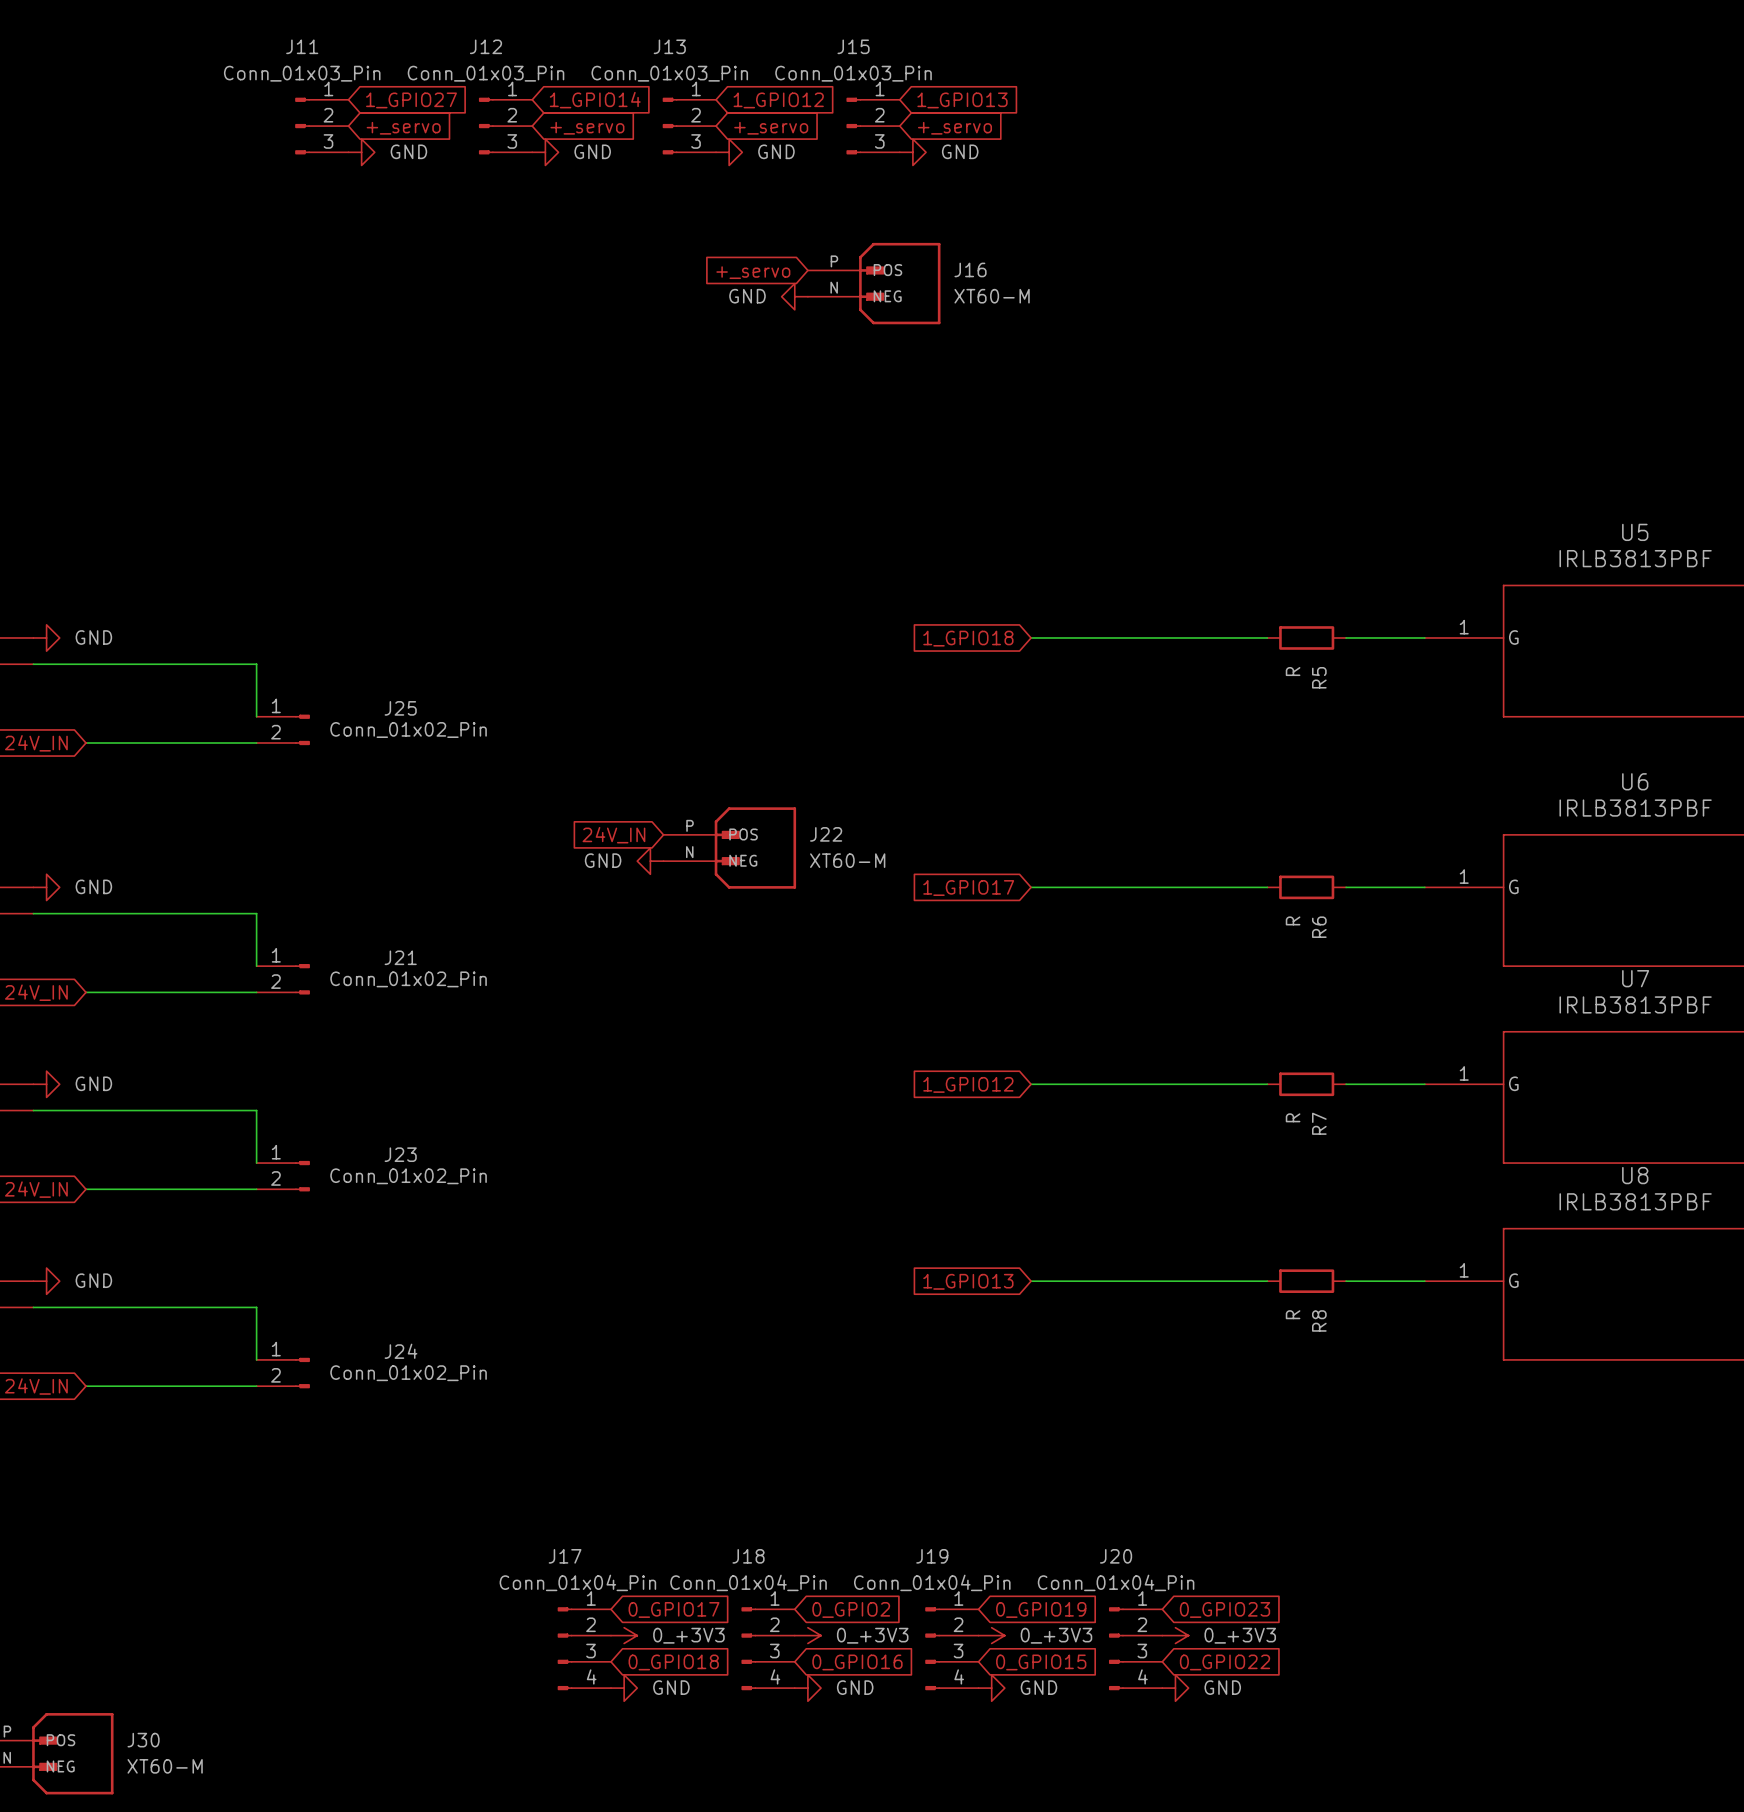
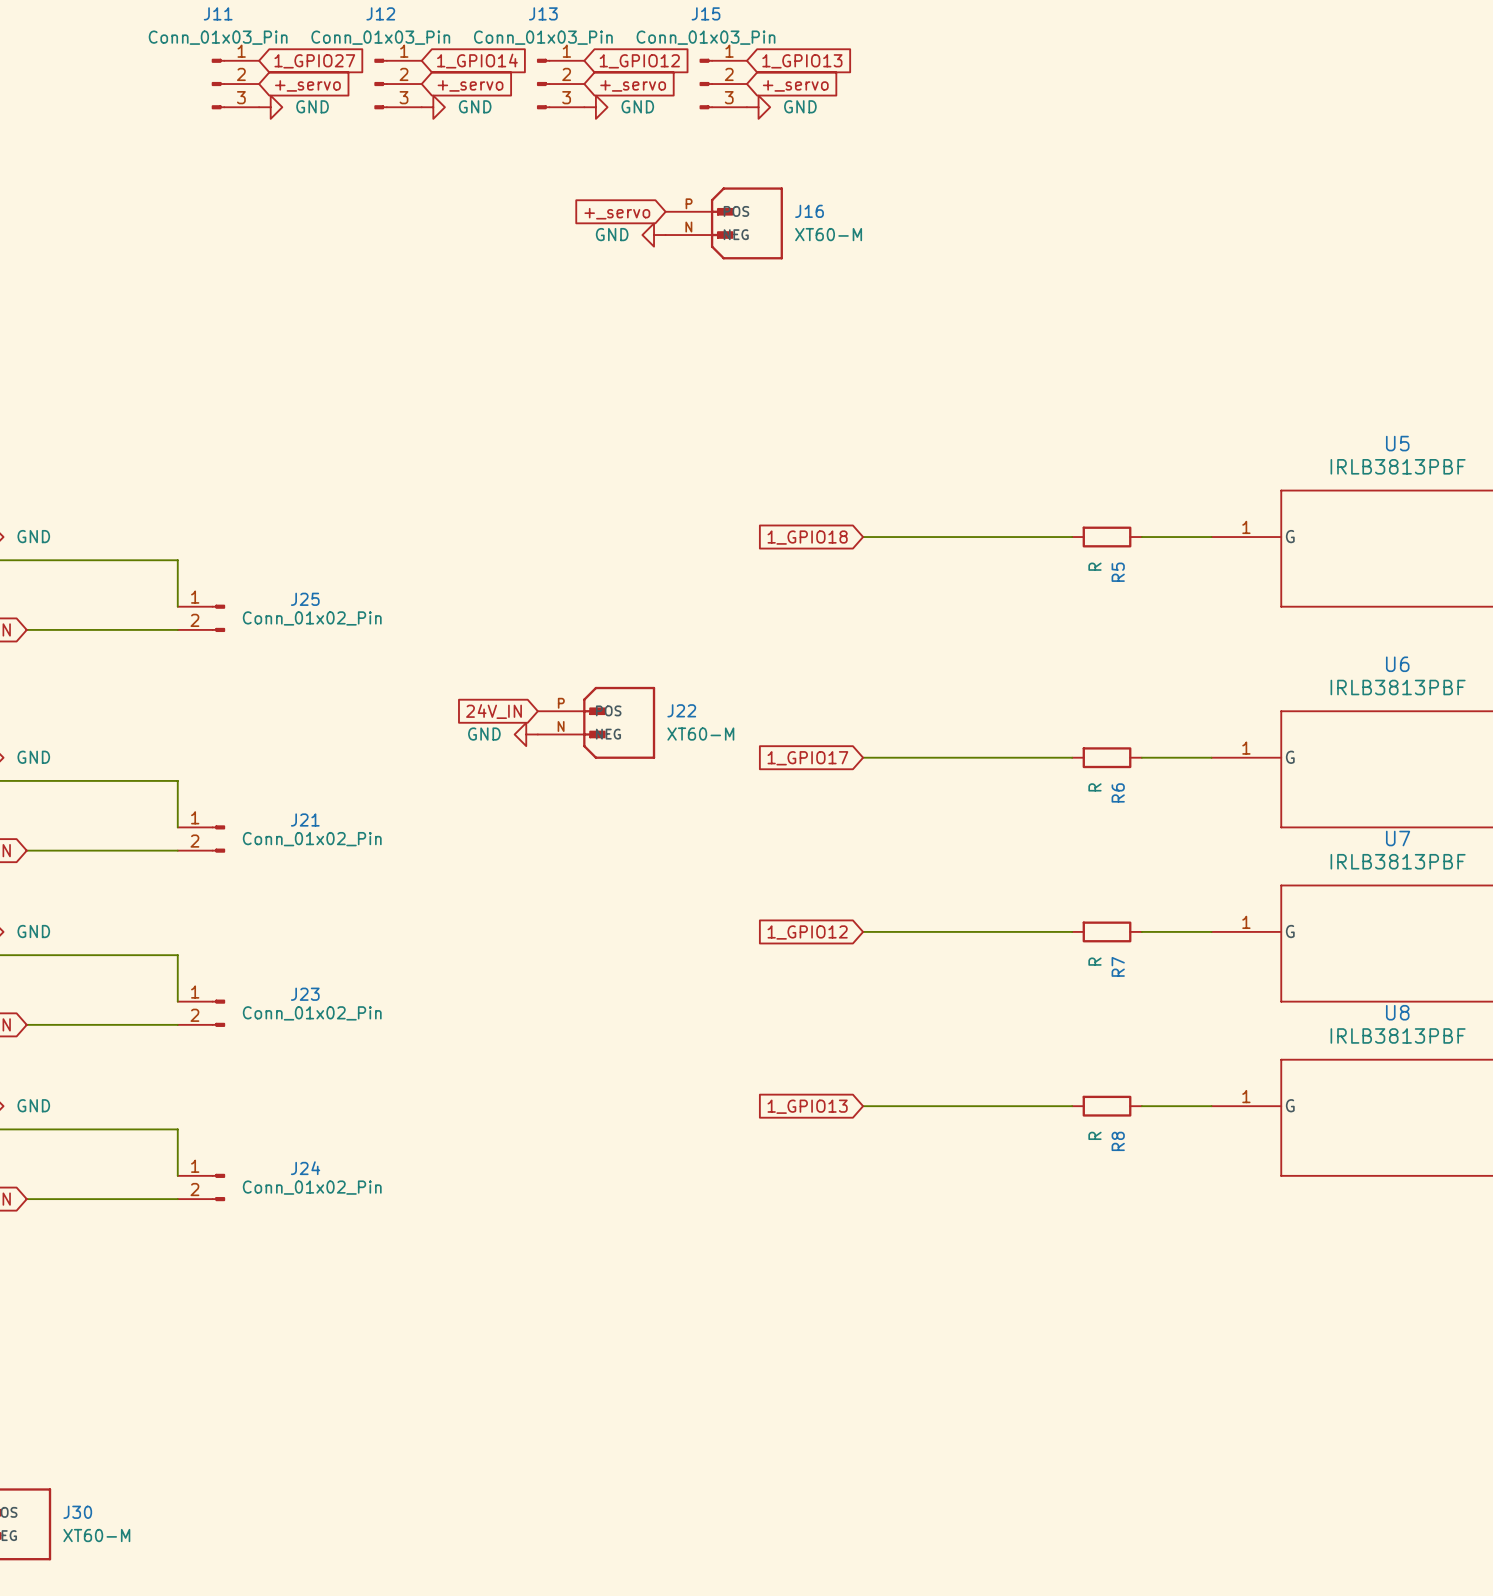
global label: 0_GPIO17 (674, 1609) -> none
global label: 0_GPIO2 (851, 1609) -> none
global label: 0_GPIO19 (1041, 1609) -> none
global label: 0_GPIO23 (1225, 1609) -> none
power symbol: 0_+3V3 (624, 1635) -> none
power symbol: 0_+3V3 (807, 1635) -> none
power symbol: 0_+3V3 (991, 1635) -> none
power symbol: 0_+3V3 (1175, 1635) -> none
J17: Conn_01x04_Pin (584, 1648) -> none
J18: Conn_01x04_Pin (768, 1648) -> none
J19: Conn_01x04_Pin (951, 1648) -> none
J20: Conn_01x04_Pin (1135, 1648) -> none
global label: 0_GPIO18 (673, 1662) -> none
global label: 0_GPIO16 (857, 1662) -> none
global label: 0_GPIO15 (1041, 1662) -> none
global label: 0_GPIO22 (1225, 1662) -> none
power symbol: GND (624, 1688) -> none
power symbol: GND (807, 1688) -> none
power symbol: GND (991, 1688) -> none
power symbol: GND (1175, 1688) -> none

